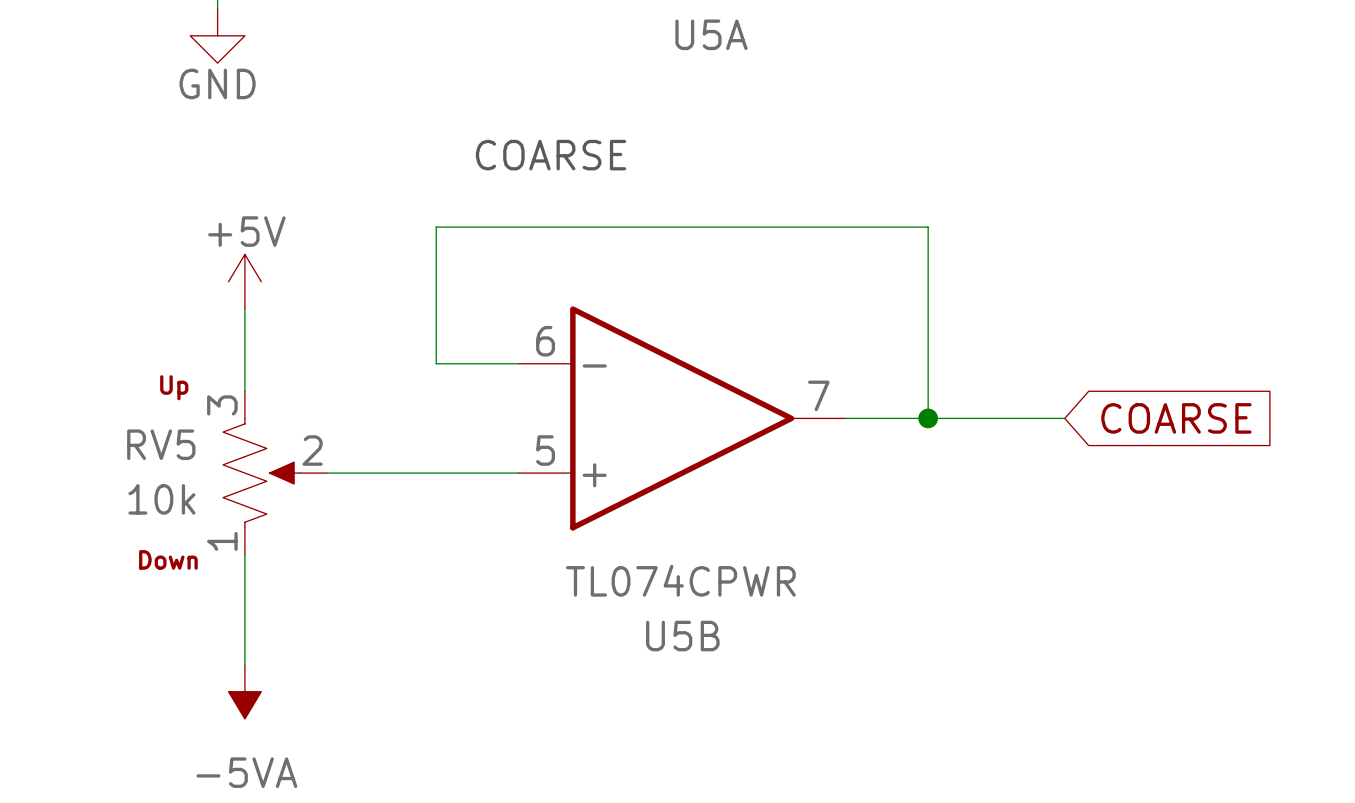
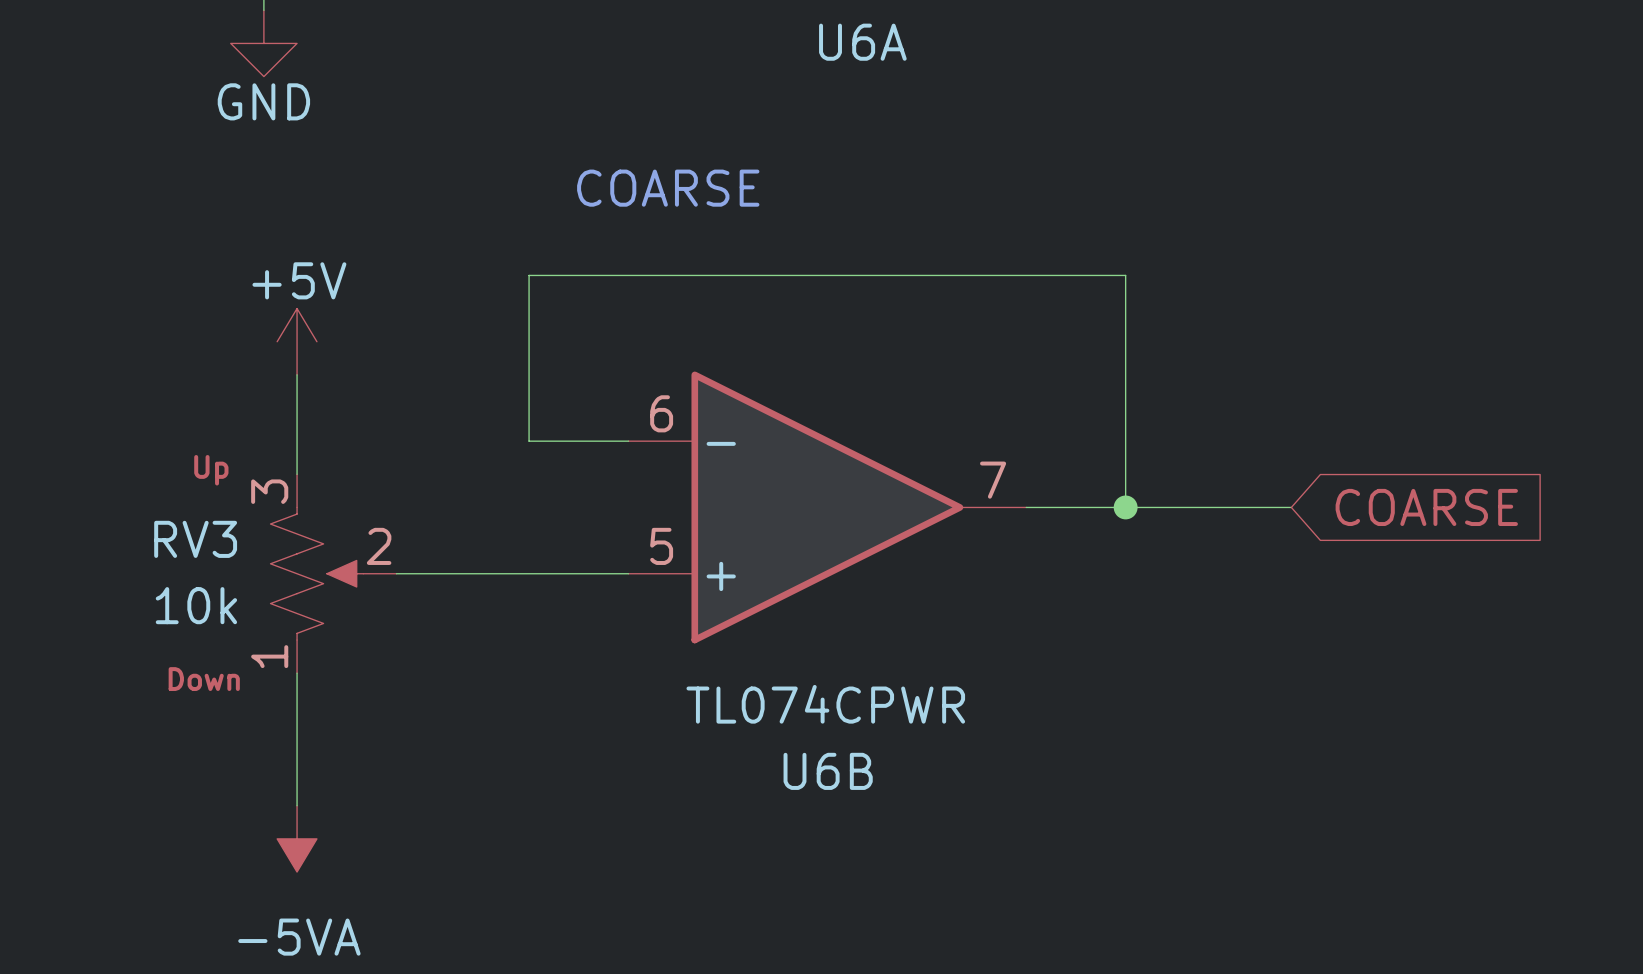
U5A name: U5A (711, 34) -> U6A (862, 42)
RV5 name: RV5 (161, 444) -> RV3 (195, 539)
U5B name: U5B (682, 636) -> U6B (828, 771)

